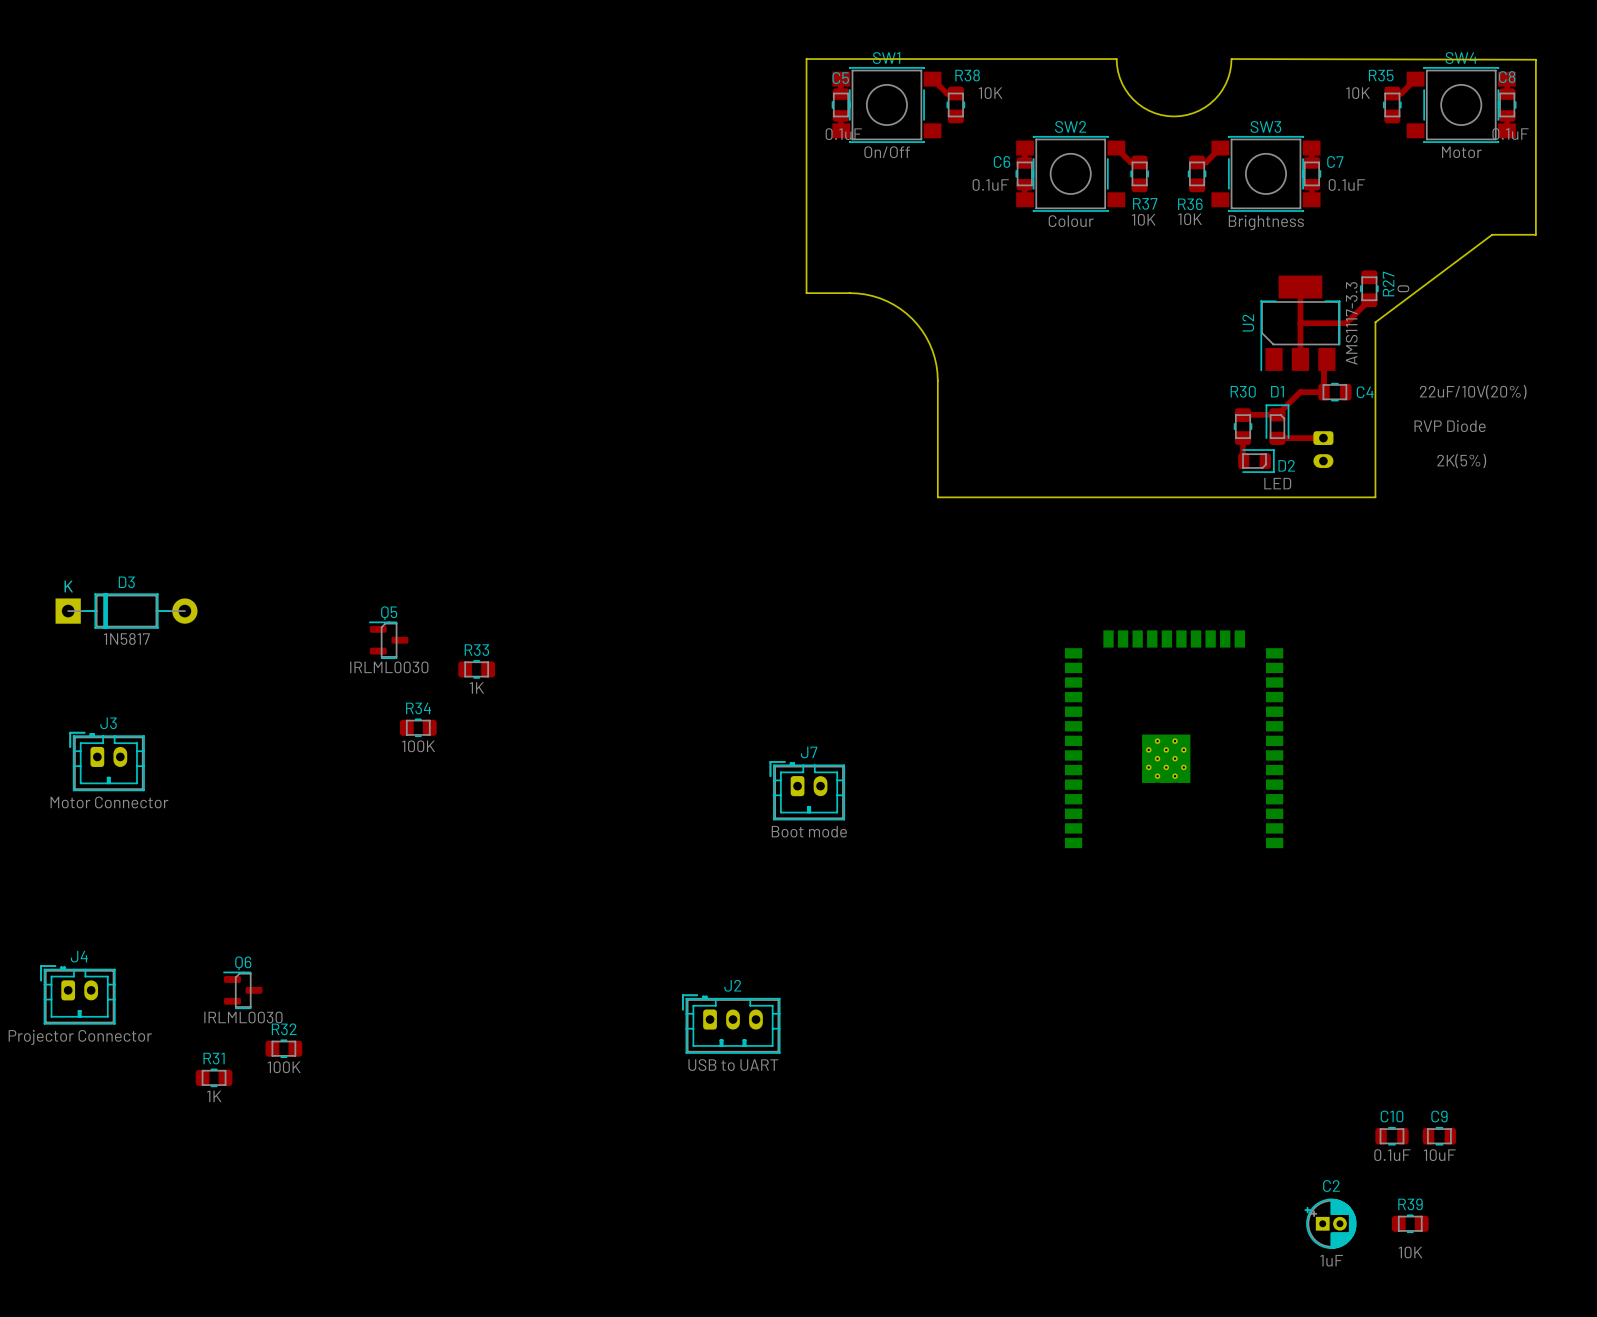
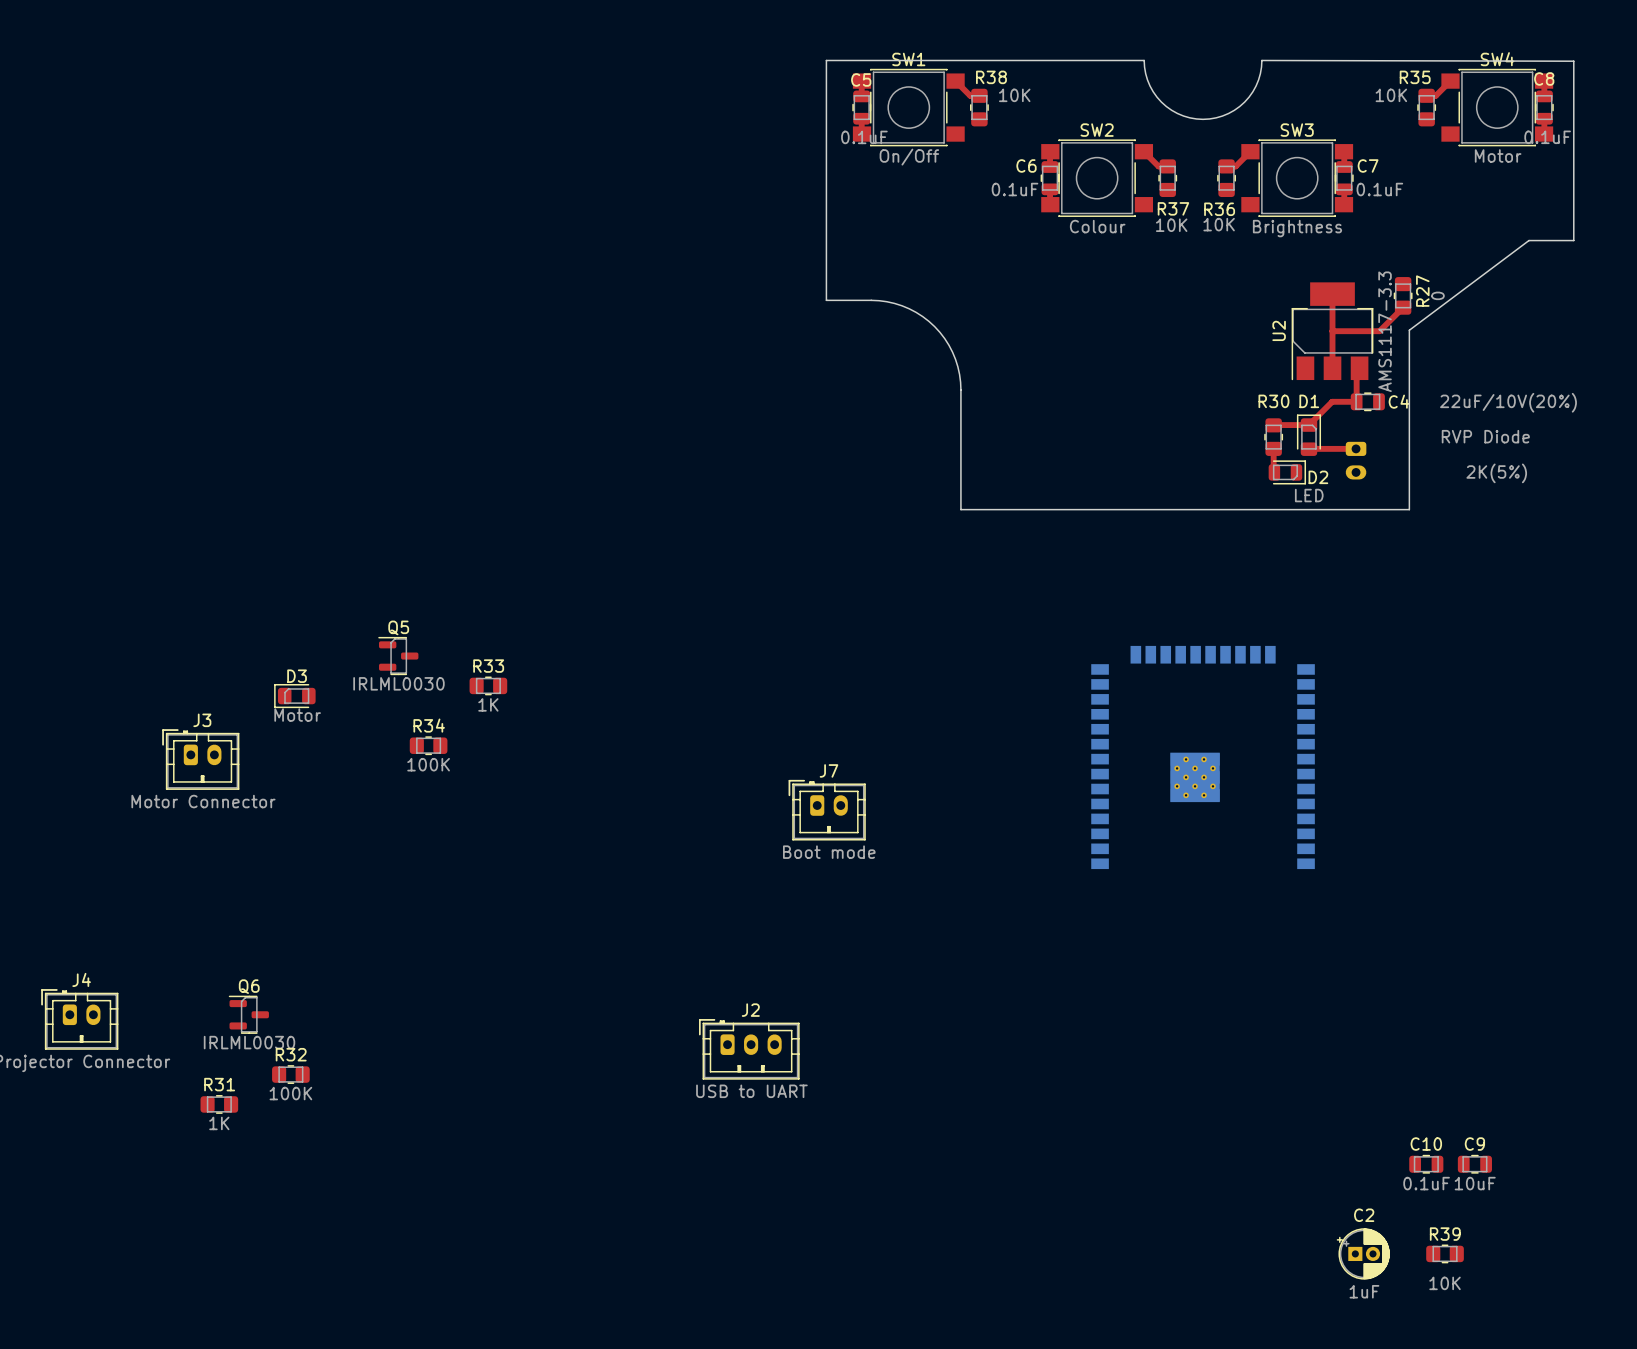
D3 footprint: [55, 593, 198, 629] -> [274, 684, 316, 709]
D3 value: 1N5817 (126, 639) -> Motor (297, 715)
J3 position: (107, 761) -> (200, 759)

